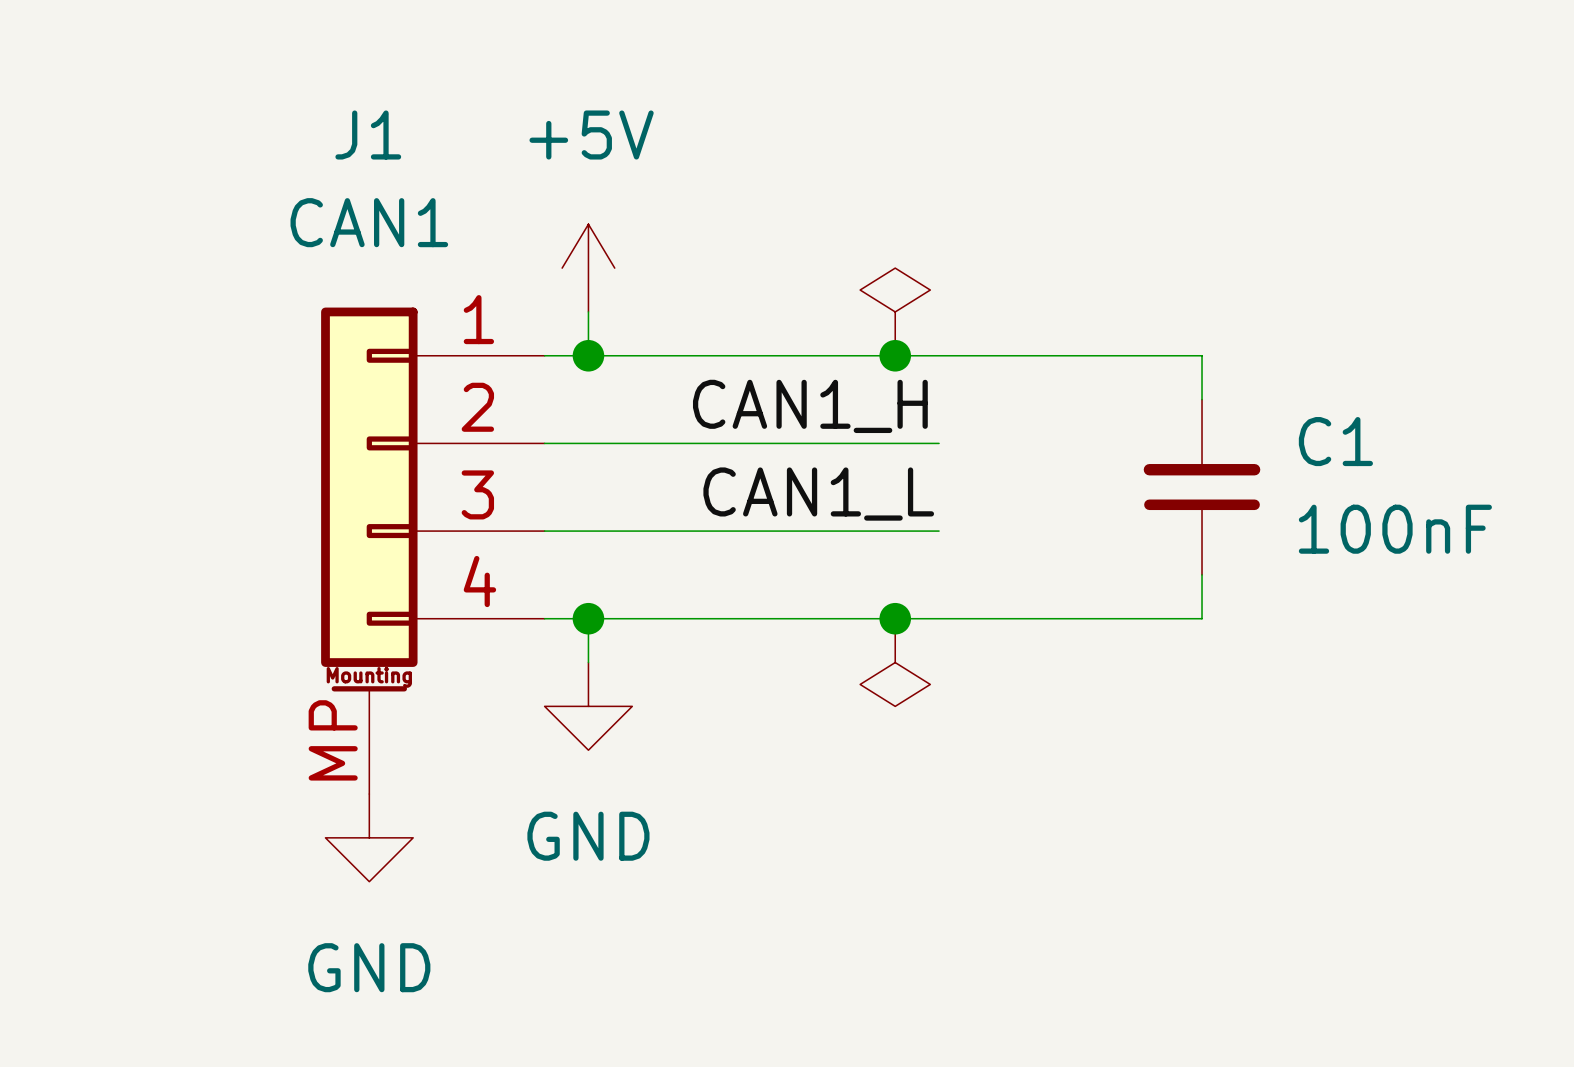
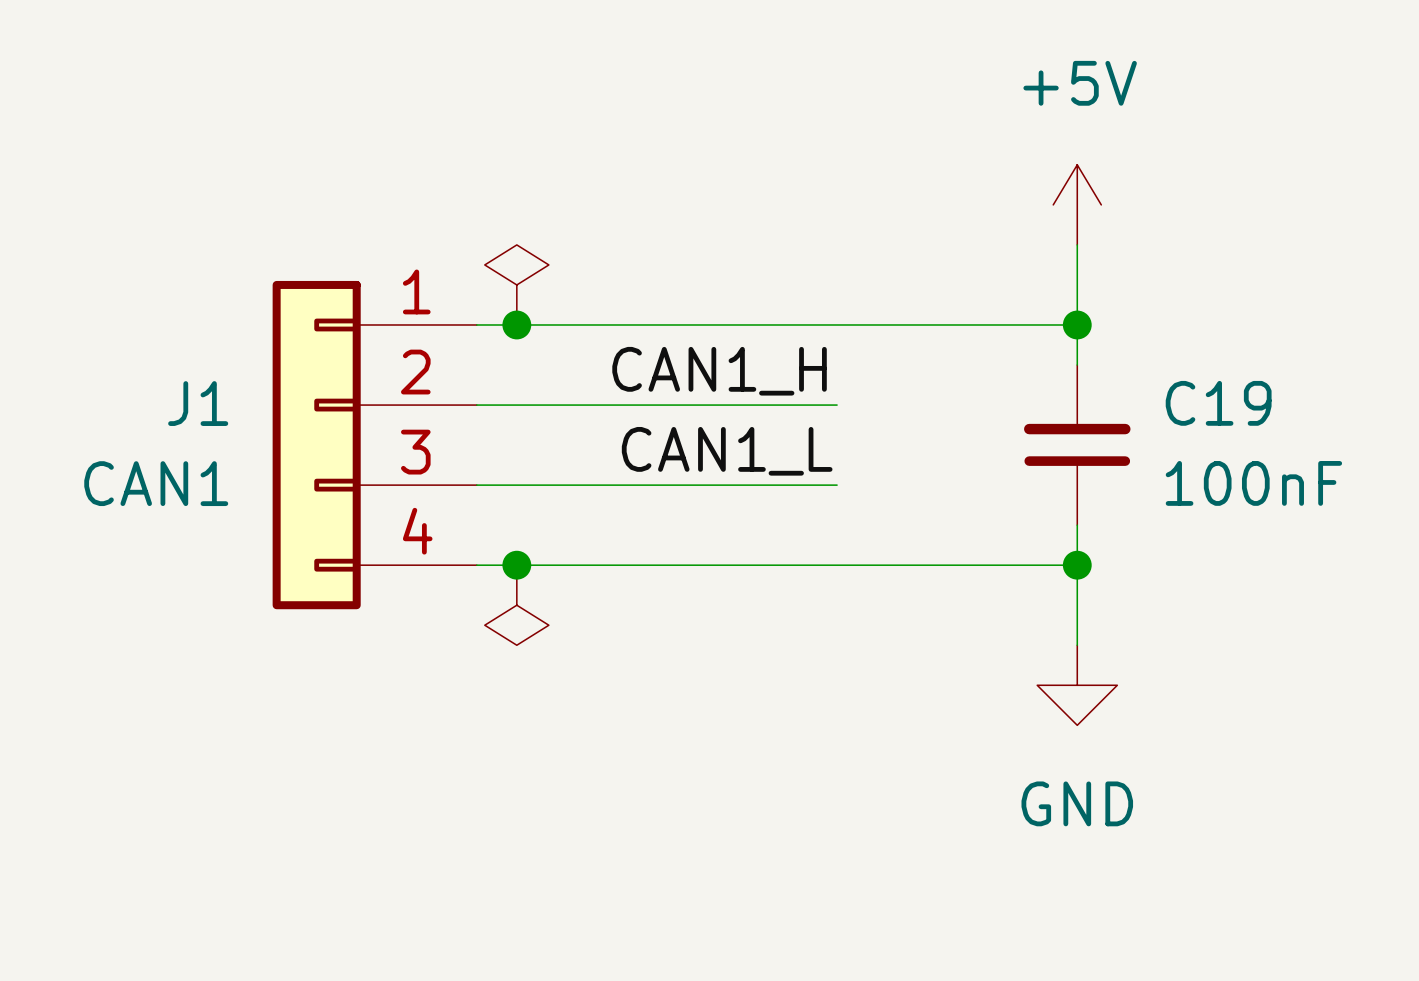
J1 name position: J1 (368, 135) -> J1 (198, 403)
J1 value position: CAN1 (369, 222) -> CAN1 (156, 483)
power symbol position: +5V (588, 268) -> +5V (1077, 204)
wire: none -> (1077, 244) (1077, 324)
J1 symbol: [321, 307, 545, 795] -> [272, 280, 477, 610]
power symbol: none -> (516, 284)
power symbol: (895, 311) -> none
junction: (895, 355) -> none
junction: none -> (1077, 324)
C1 name: C1 (1335, 441) -> C19 (1218, 403)
junction: (895, 618) -> none
wire: none -> (1077, 565) (1077, 645)
junction: none -> (1077, 565)
power symbol: none -> (516, 605)
power symbol: (895, 662) -> none
power symbol: GND (588, 706) -> none
power symbol: none -> GND (1077, 685)
power symbol: GND (369, 837) -> none

